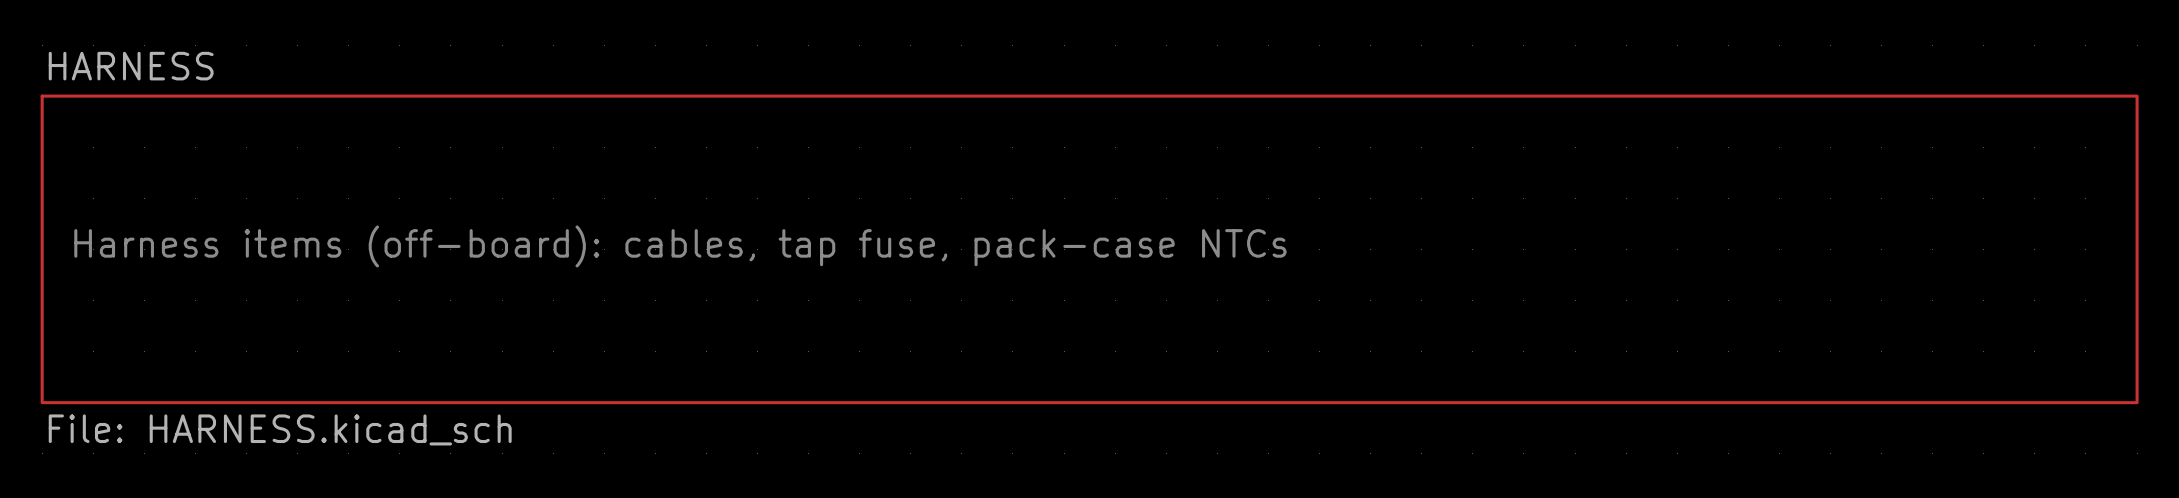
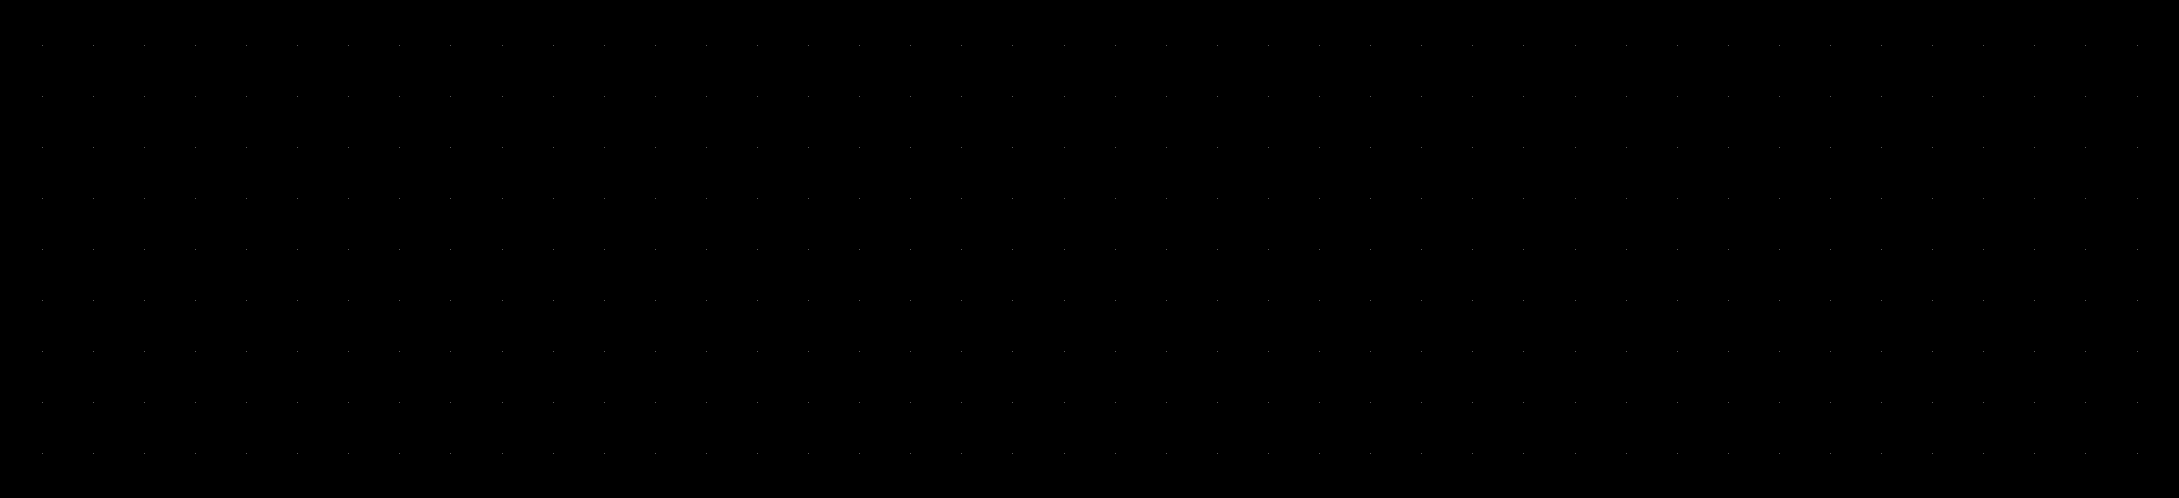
text: Harness items (off-board): cables, tap fuse, pack-case NTCs (680, 246) -> none
sheet HARNESS: File: HARNESS.kicad_sch (1089, 249) -> none

